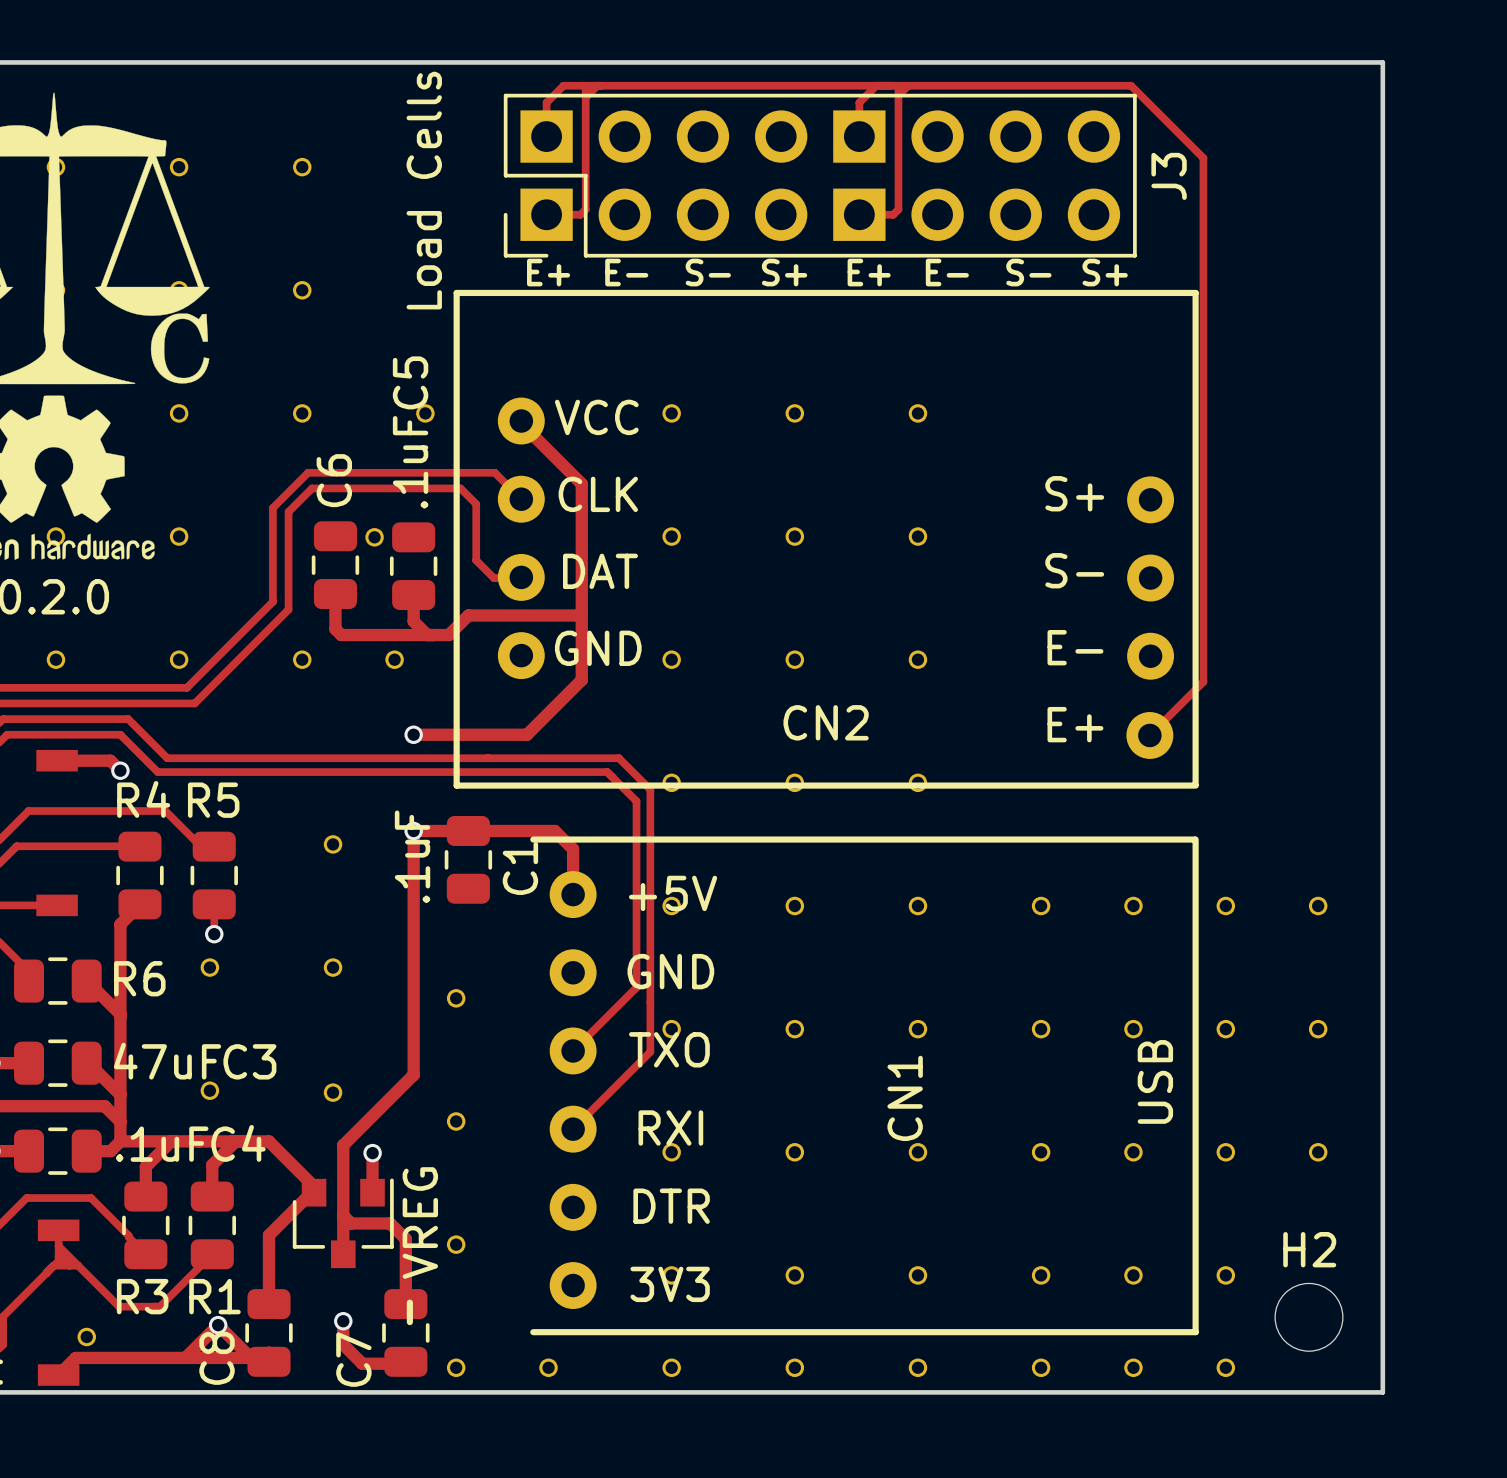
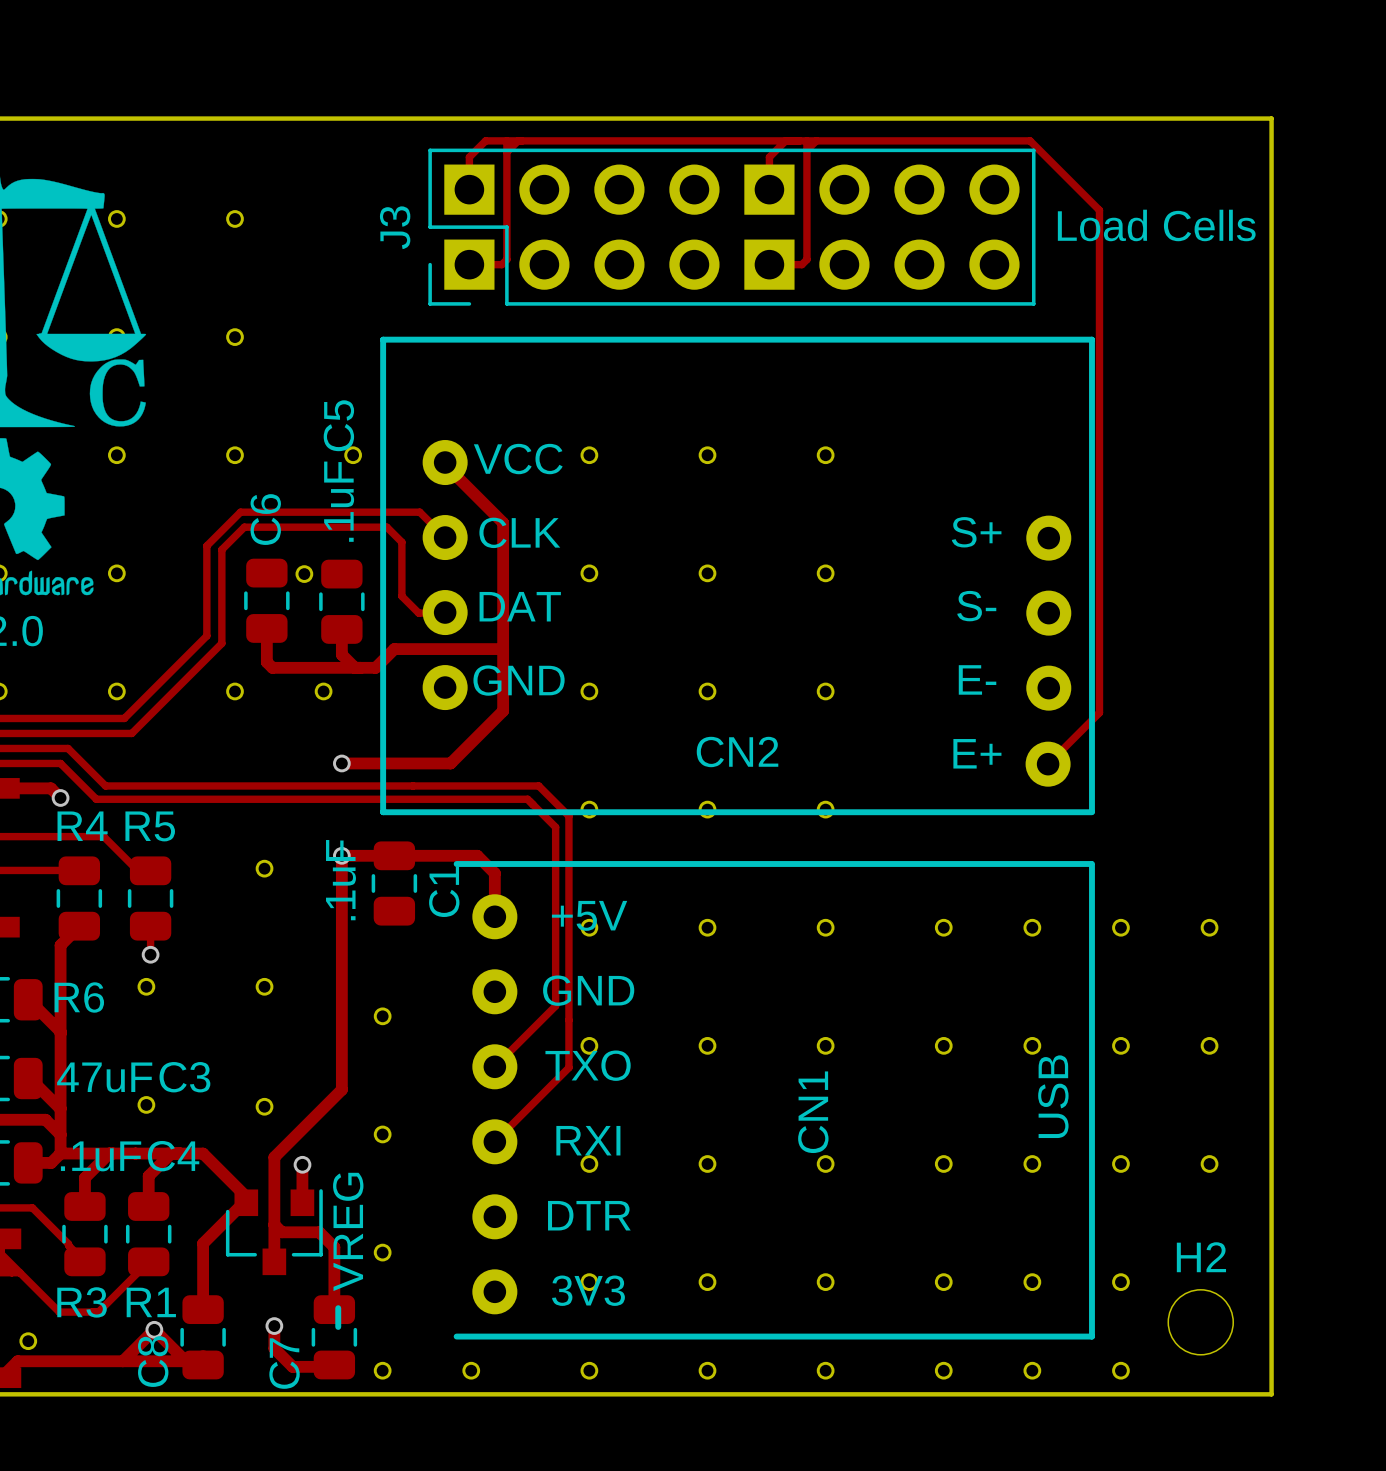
text: none -> Load Cells (1156, 225)
J3 name position: J3 (1169, 176) -> J3 (395, 227)
text: Load Cells (424, 190) -> none
text: E+ (548, 272) -> none
text: E- (626, 272) -> none
text: S- (708, 272) -> none
text: S+ (784, 272) -> none
text: E+ (869, 272) -> none
text: E- (947, 272) -> none
text: S- (1028, 272) -> none
text: S+ (1105, 272) -> none

